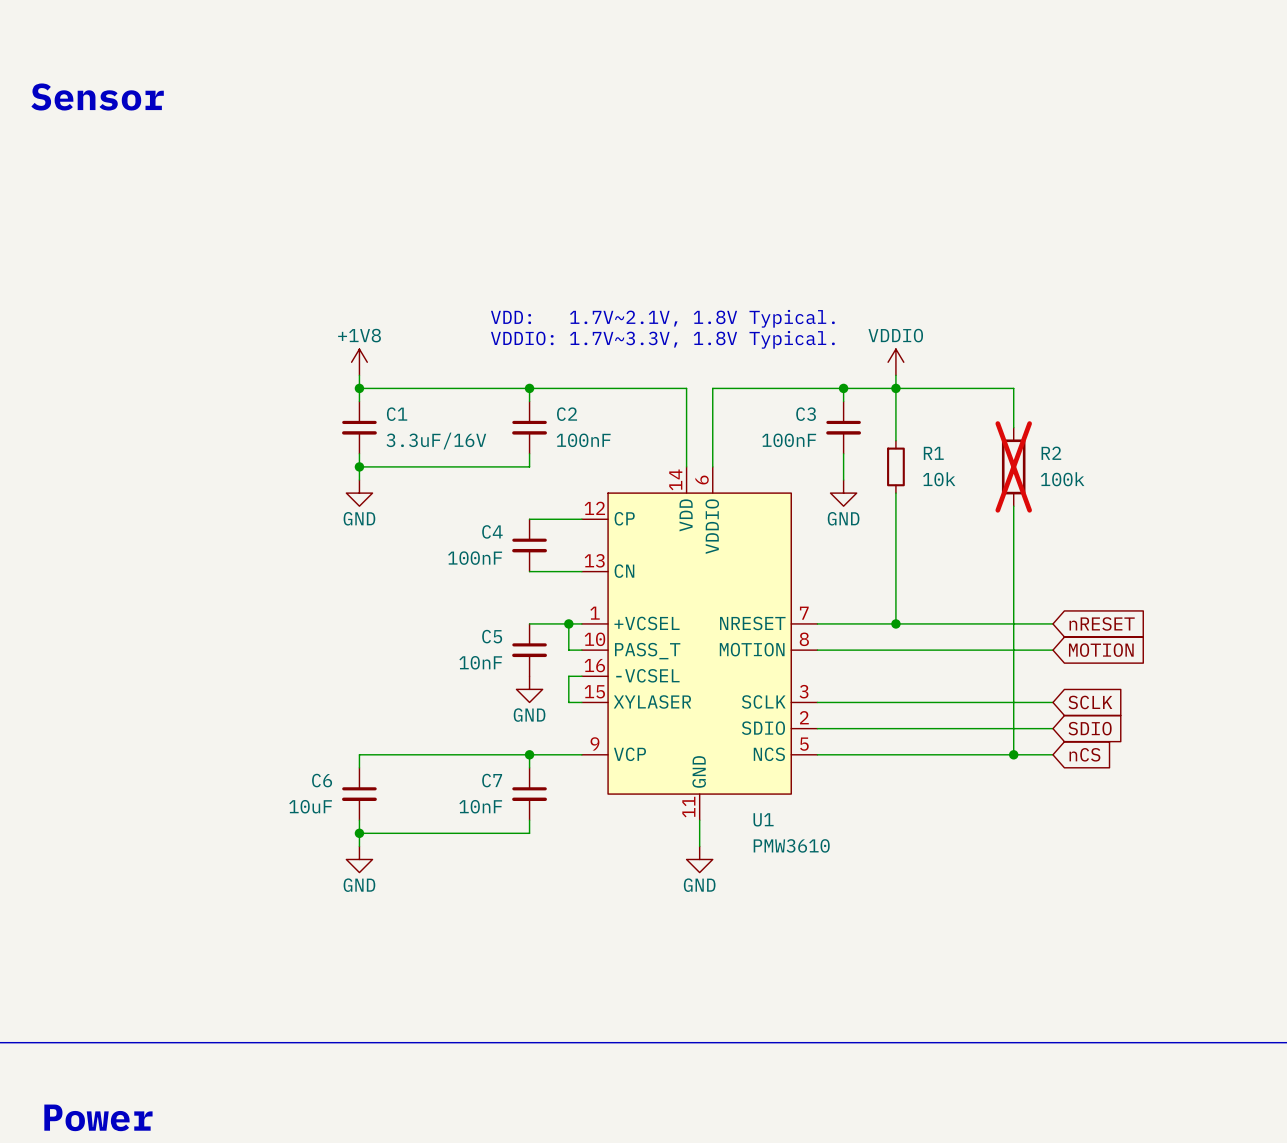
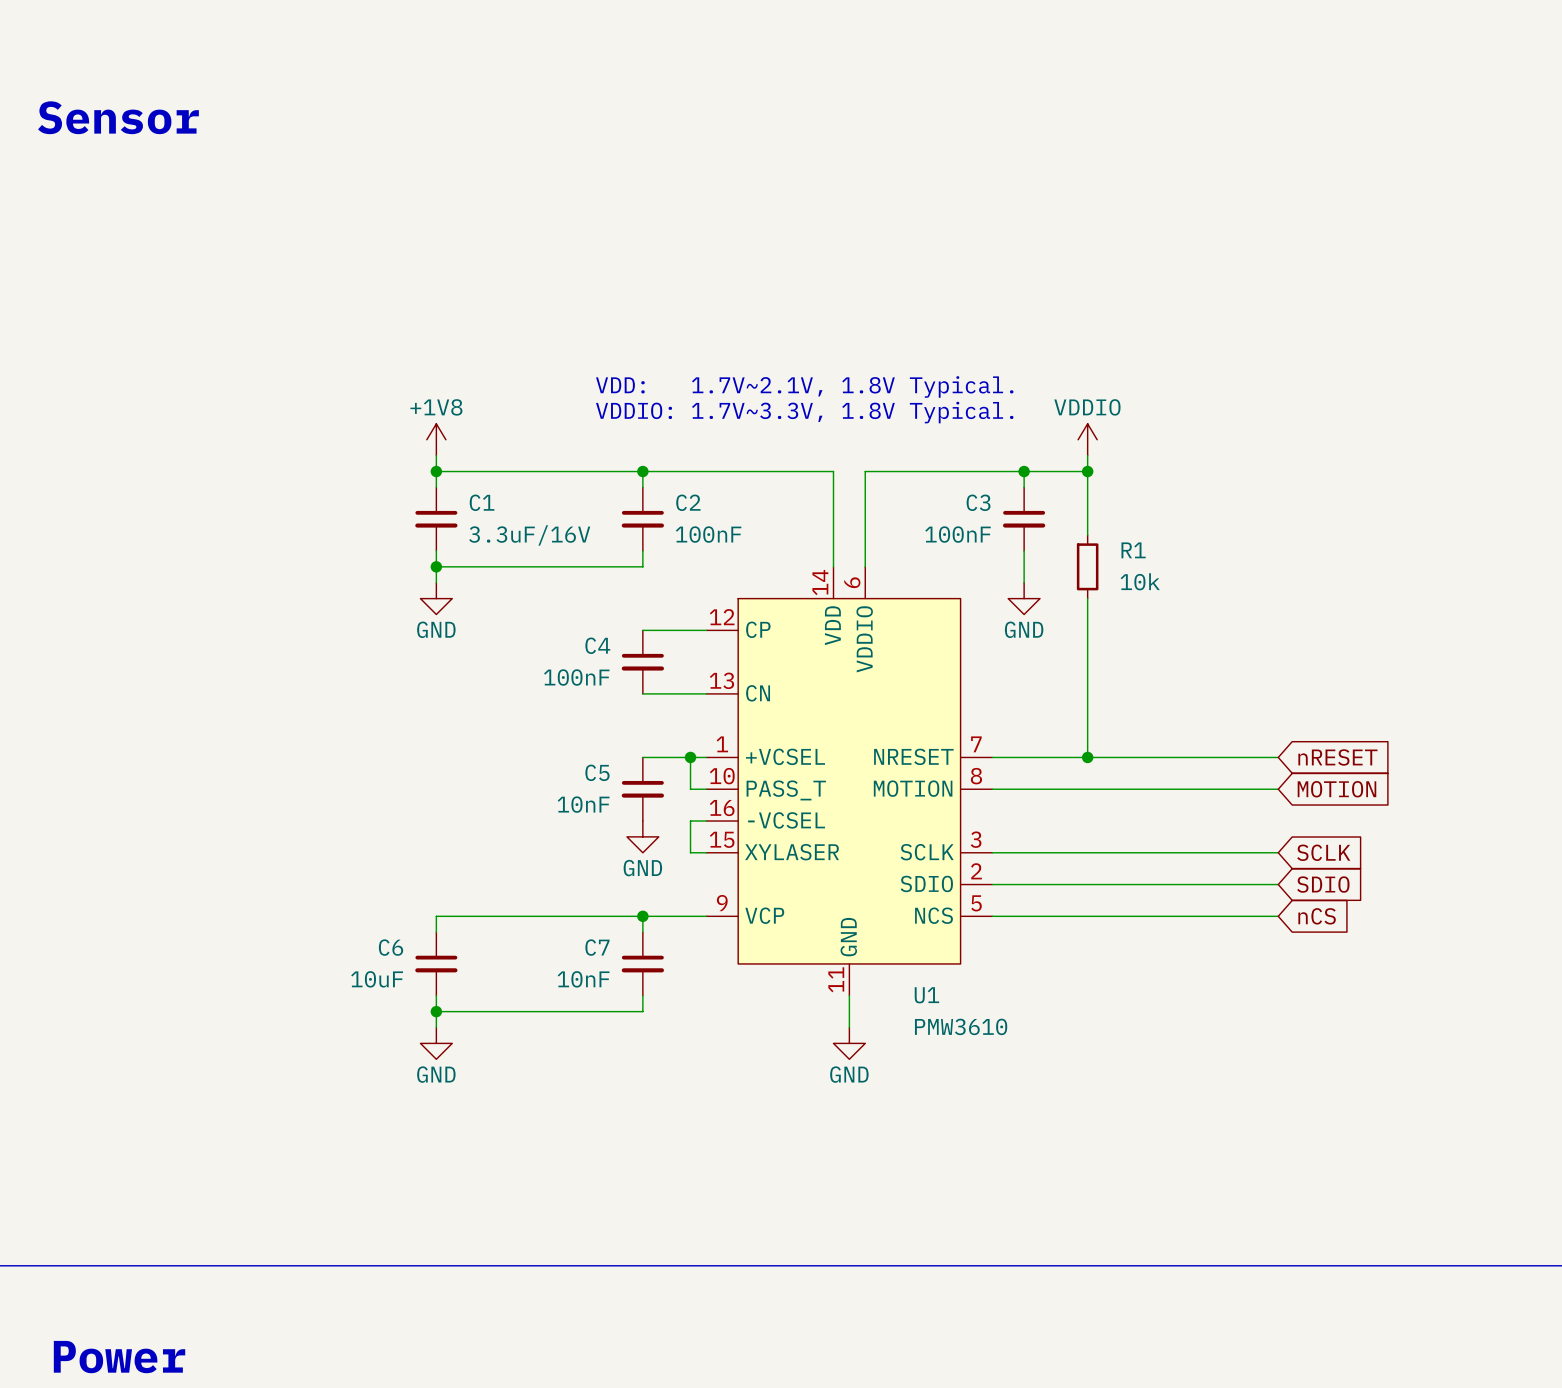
wire: (895, 388) (1013, 388) (1013, 427) -> none
R2: 100k (1013, 466) -> none
wire: (1013, 506) (1013, 754) -> none
junction: (1013, 754) -> none

